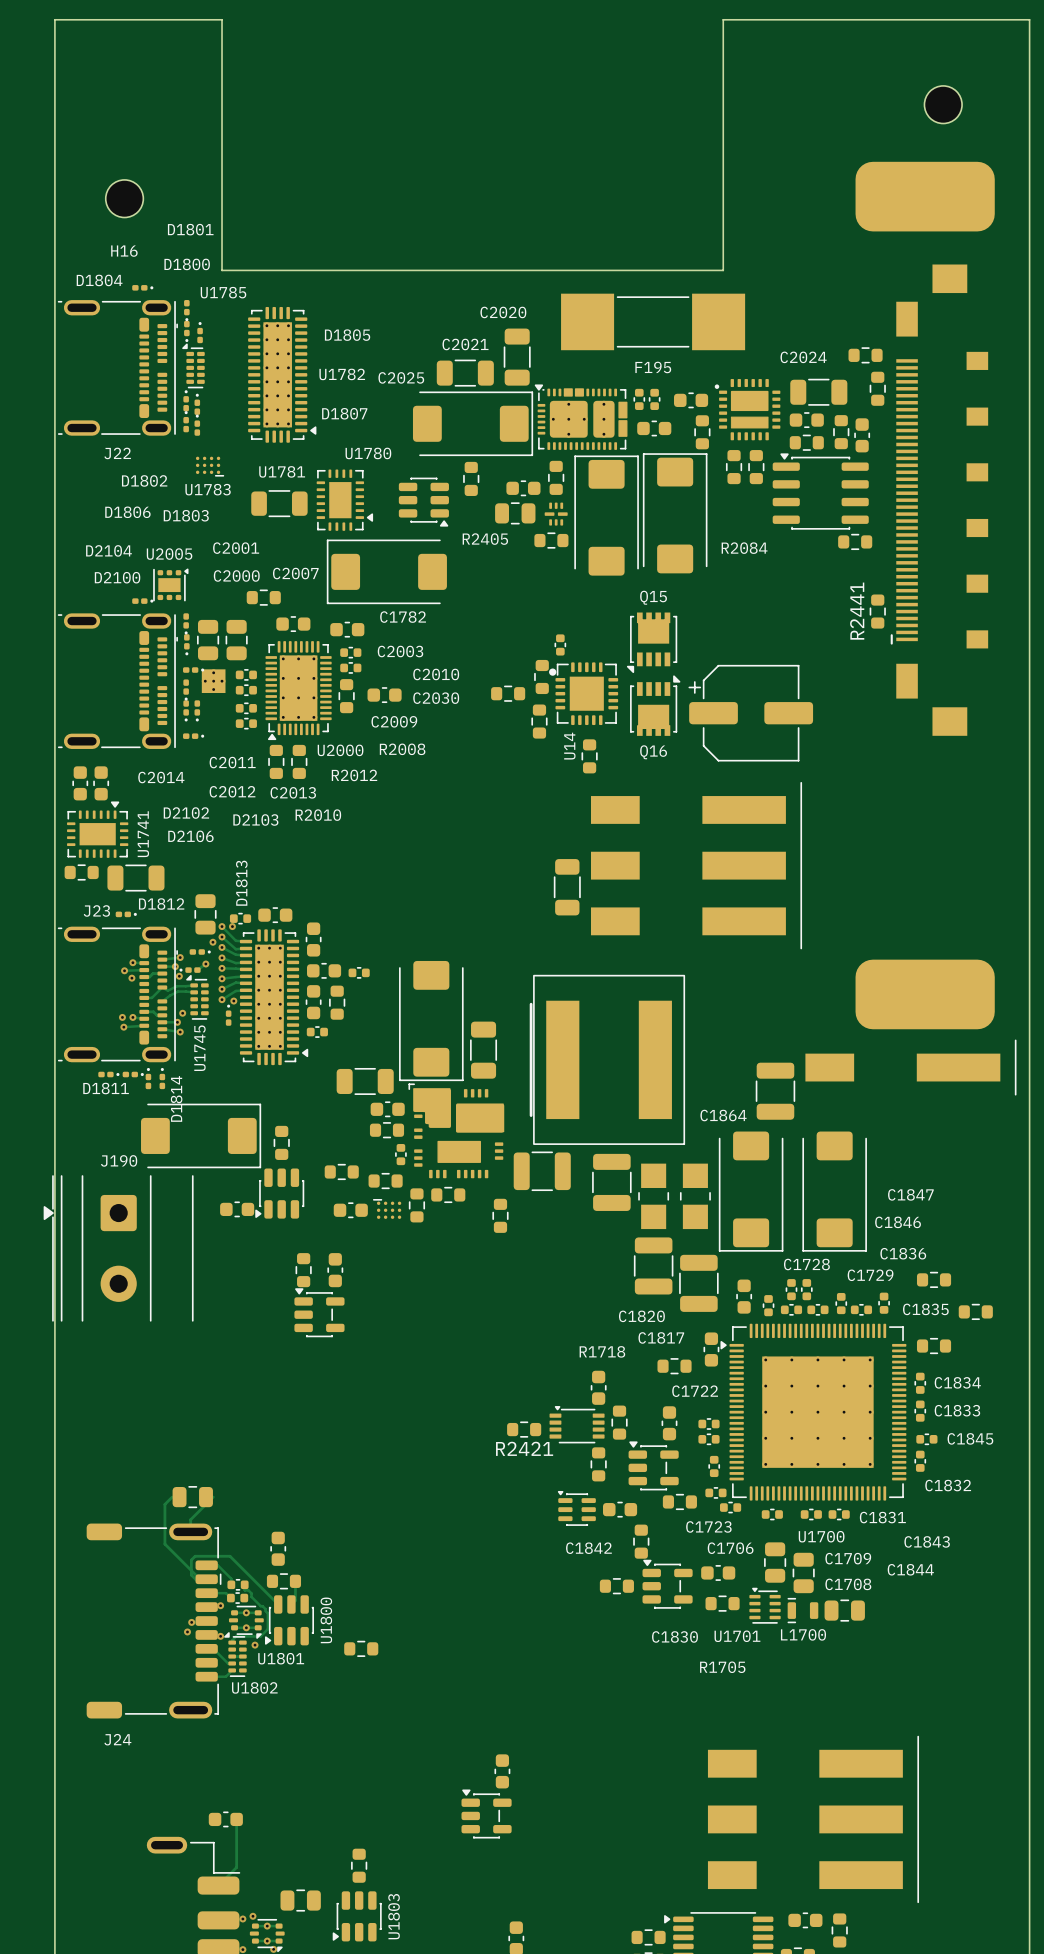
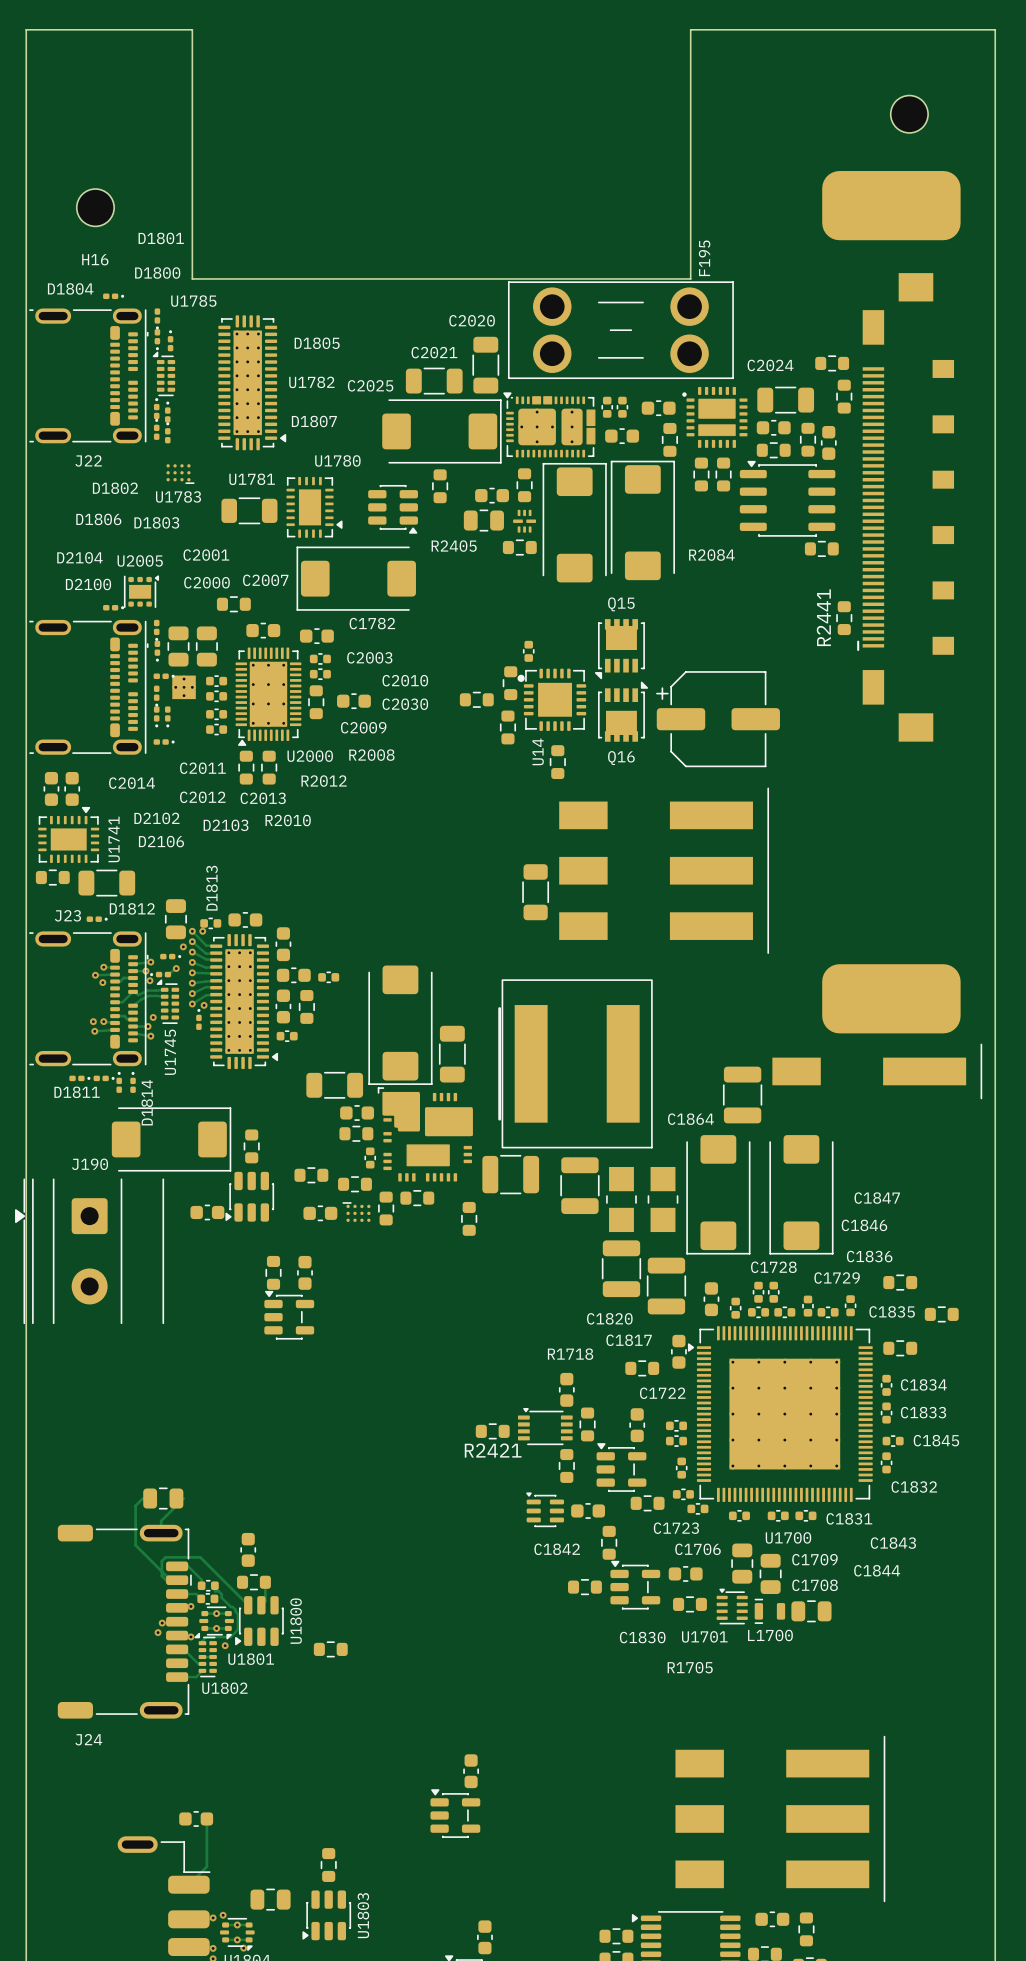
F195 footprint: [561, 293, 746, 351] -> [507, 281, 734, 380]
F195 name position: F195 (653, 367) -> F195 (704, 258)

